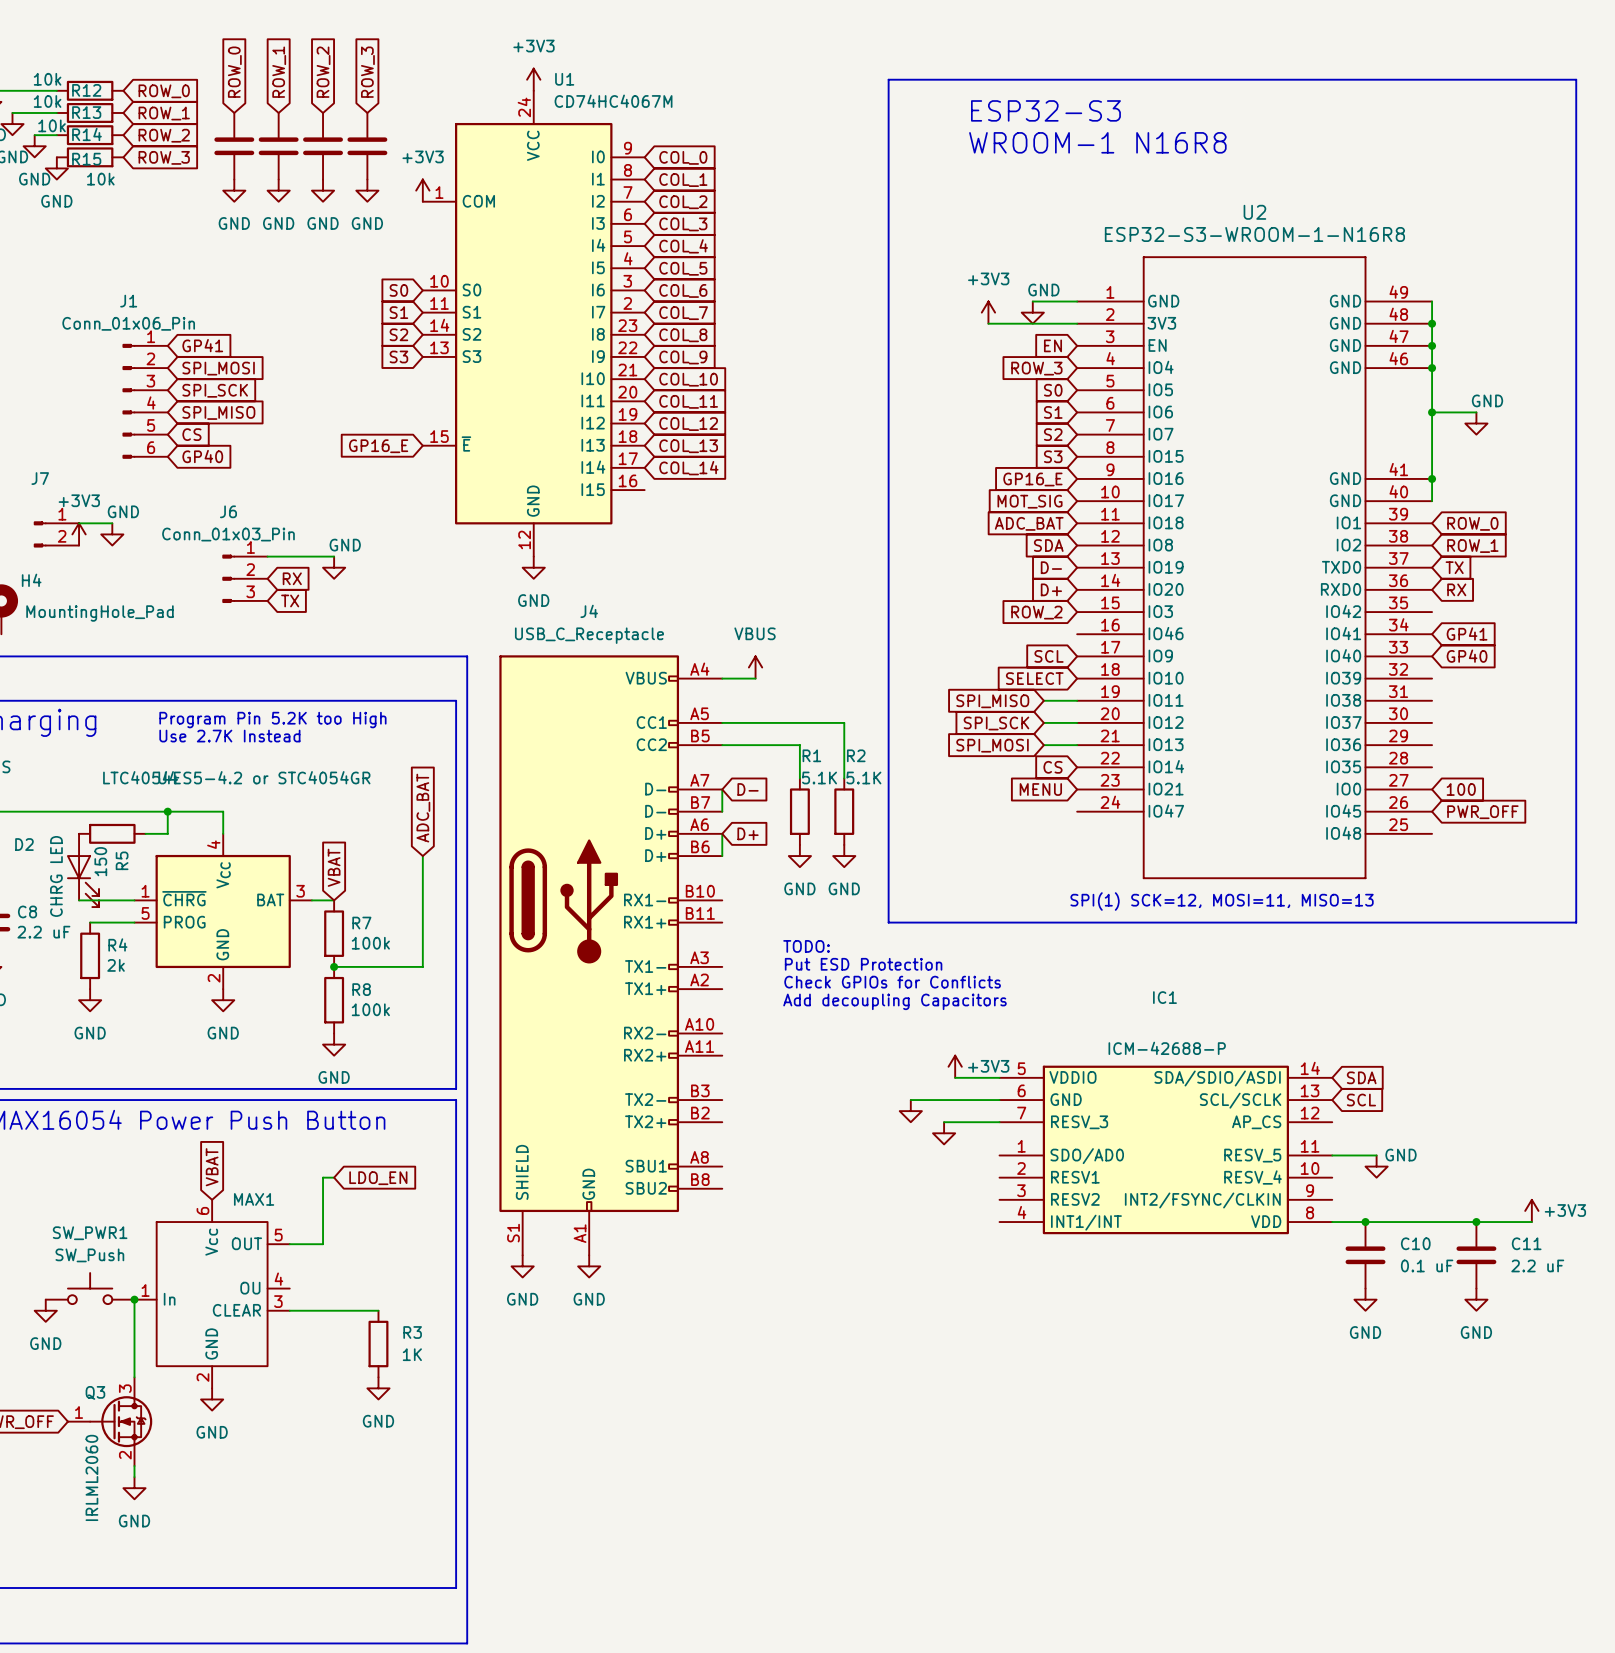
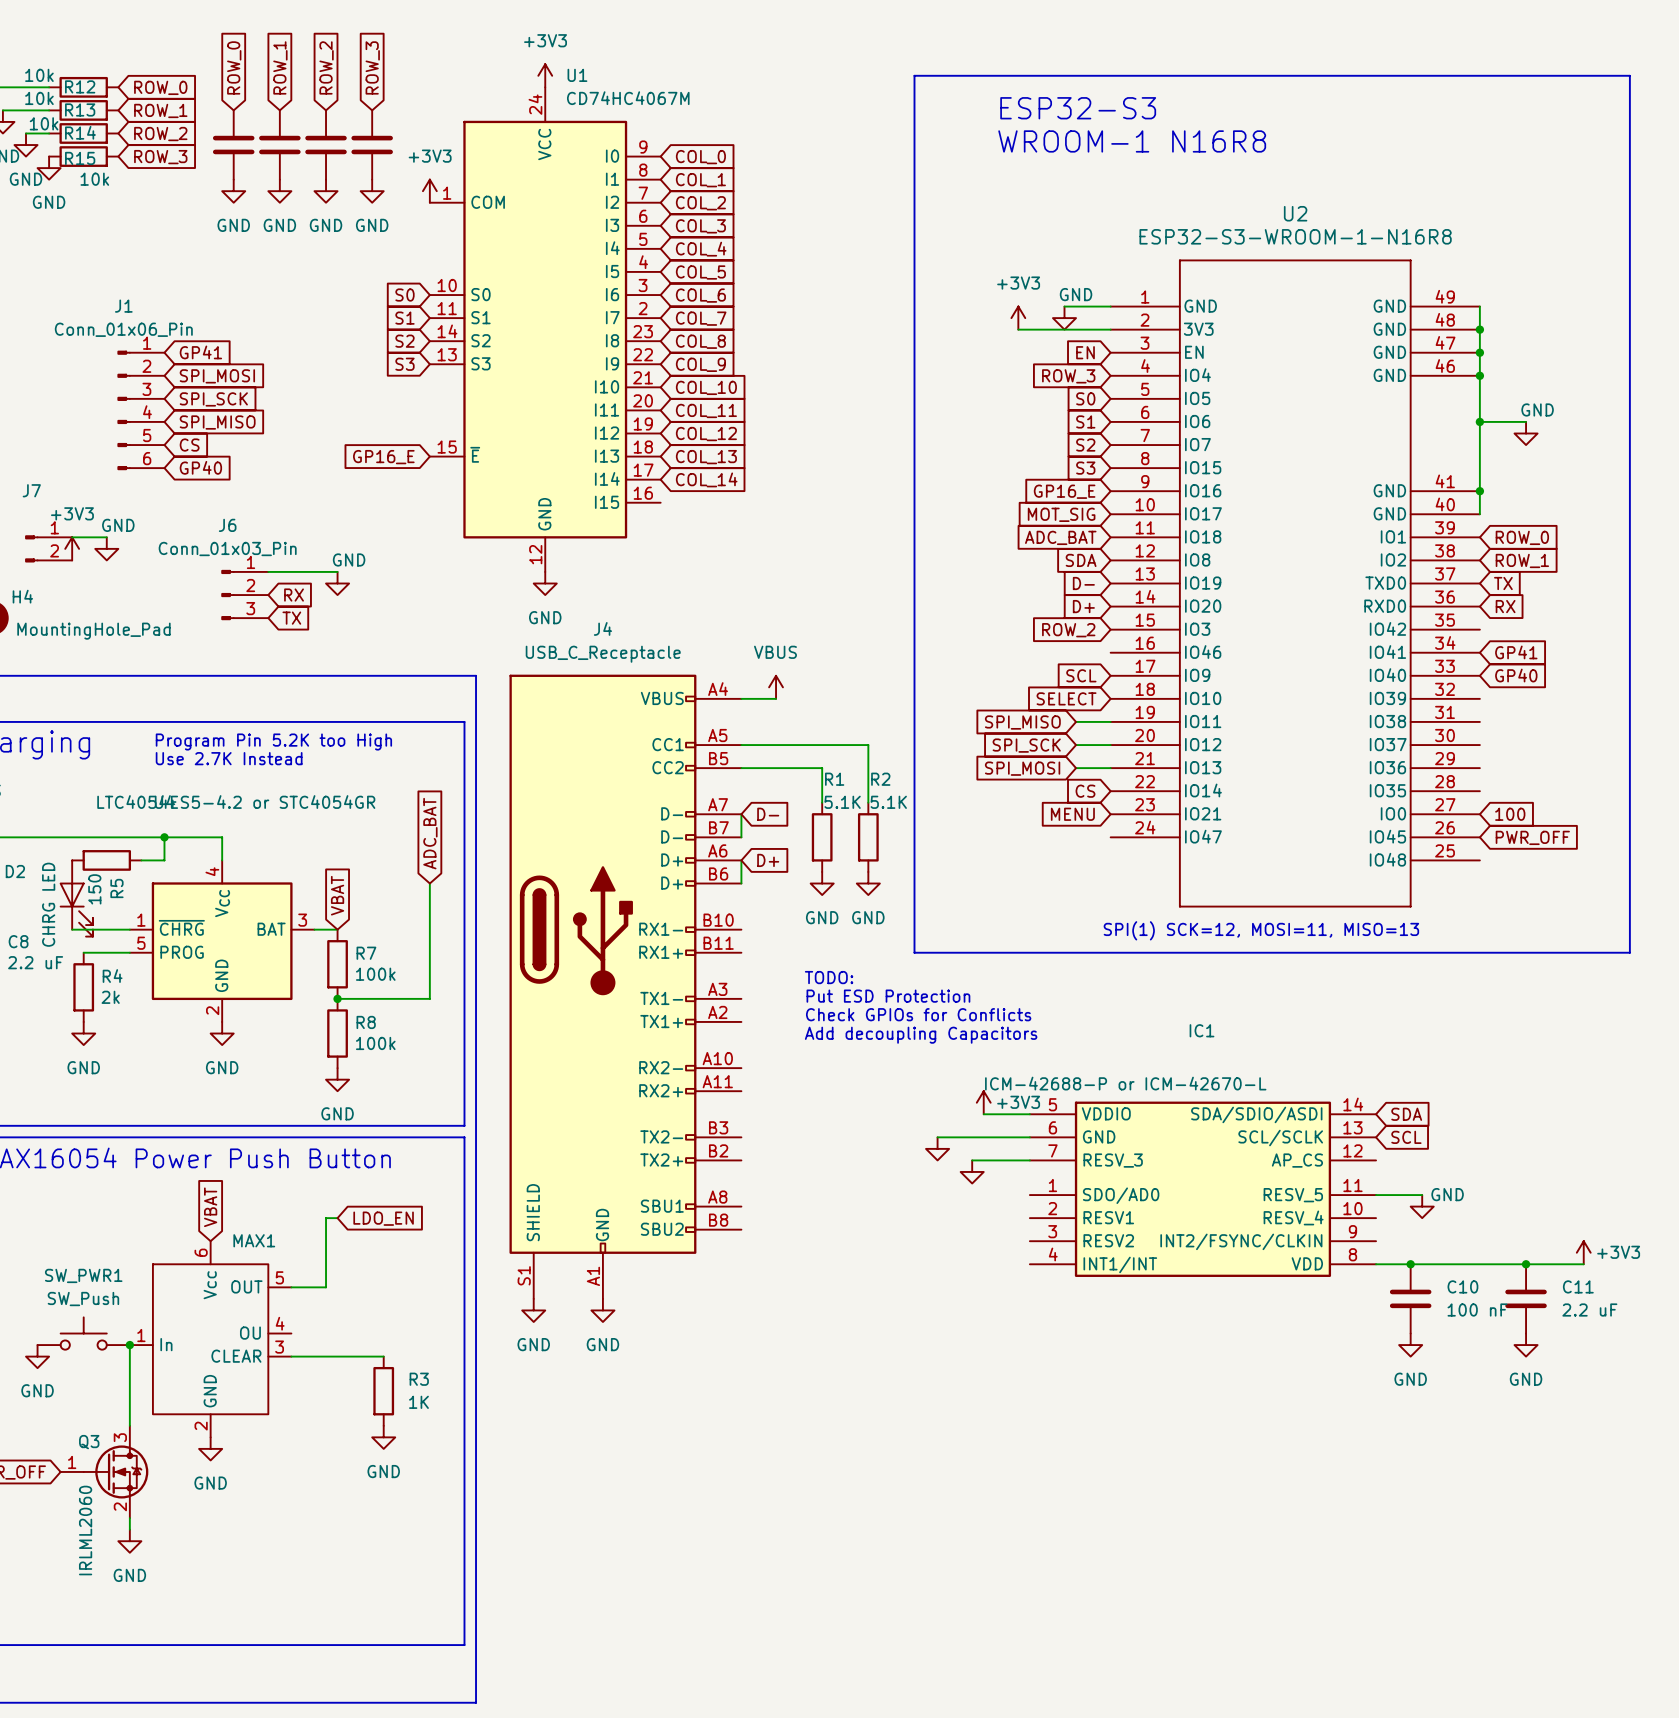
IC1 value: ICM-42688-P (1167, 1048) -> ICM-42688-P or ICM-42670-L (1125, 1083)
C10 value: 0.1 uF (1427, 1265) -> 100 nF (1477, 1310)

